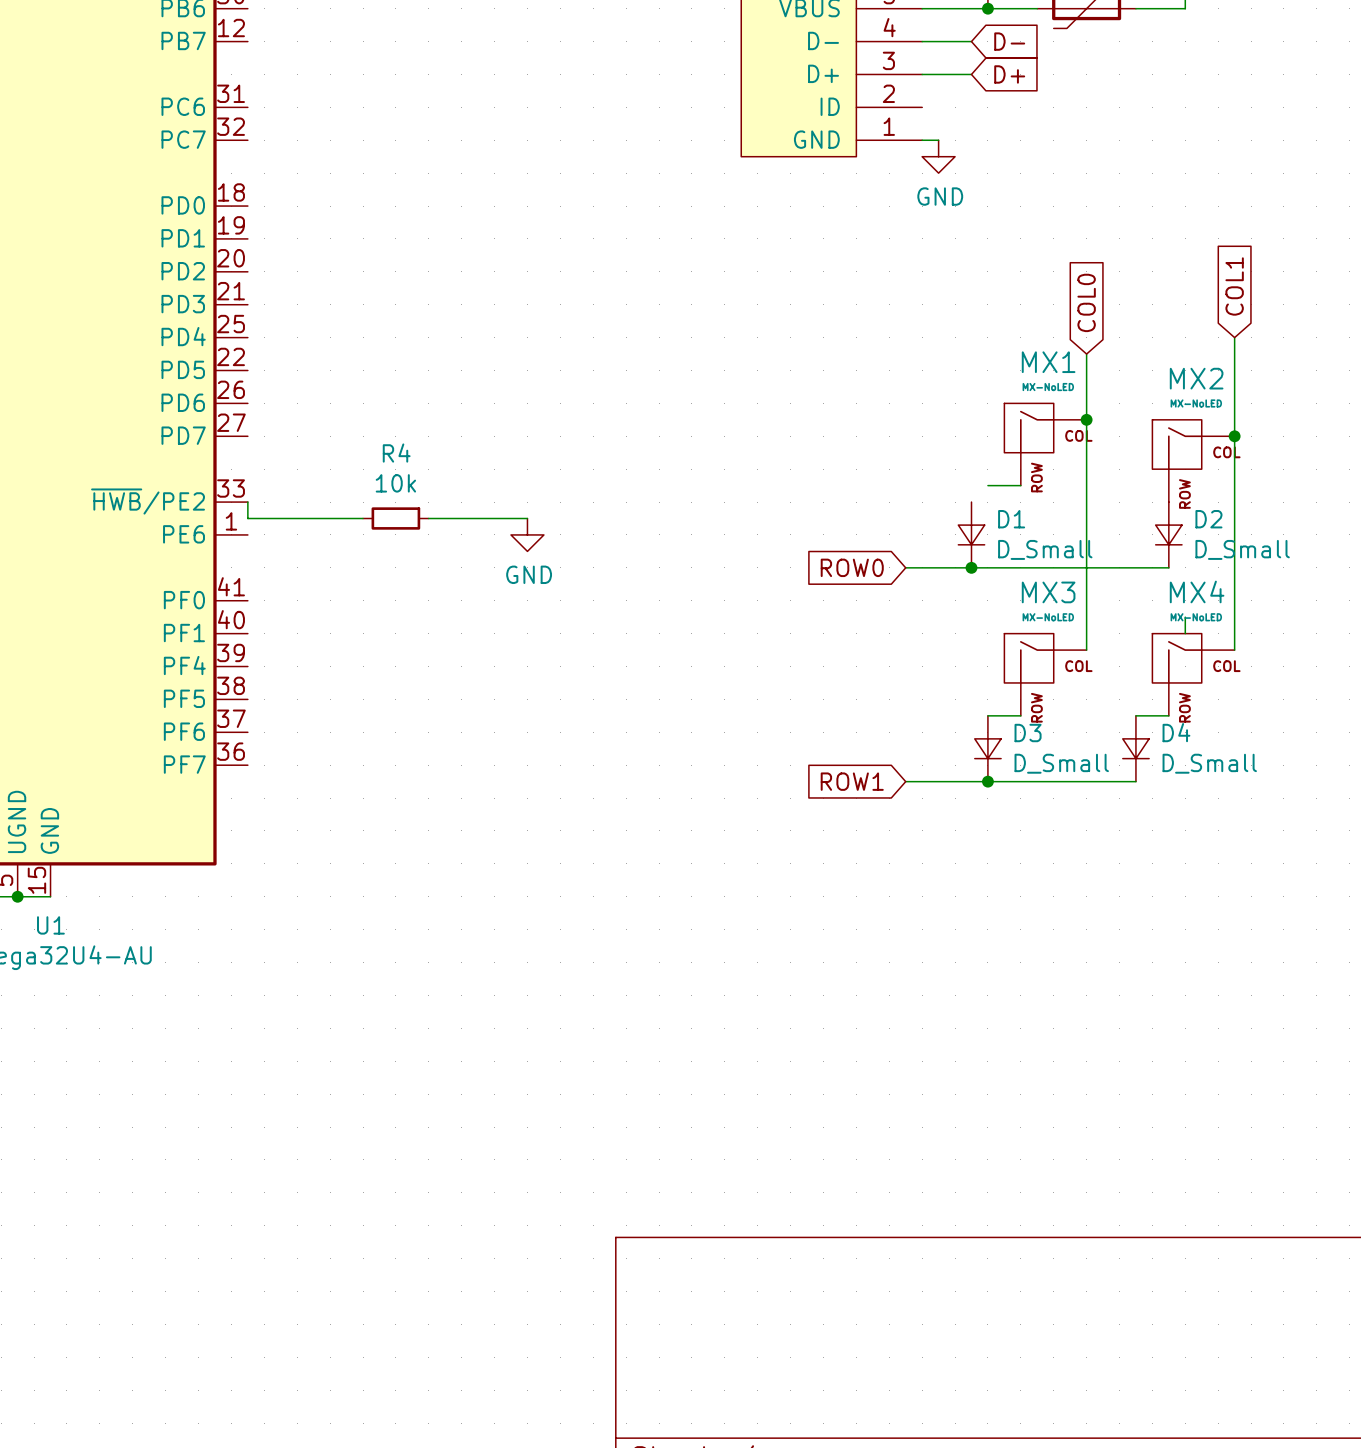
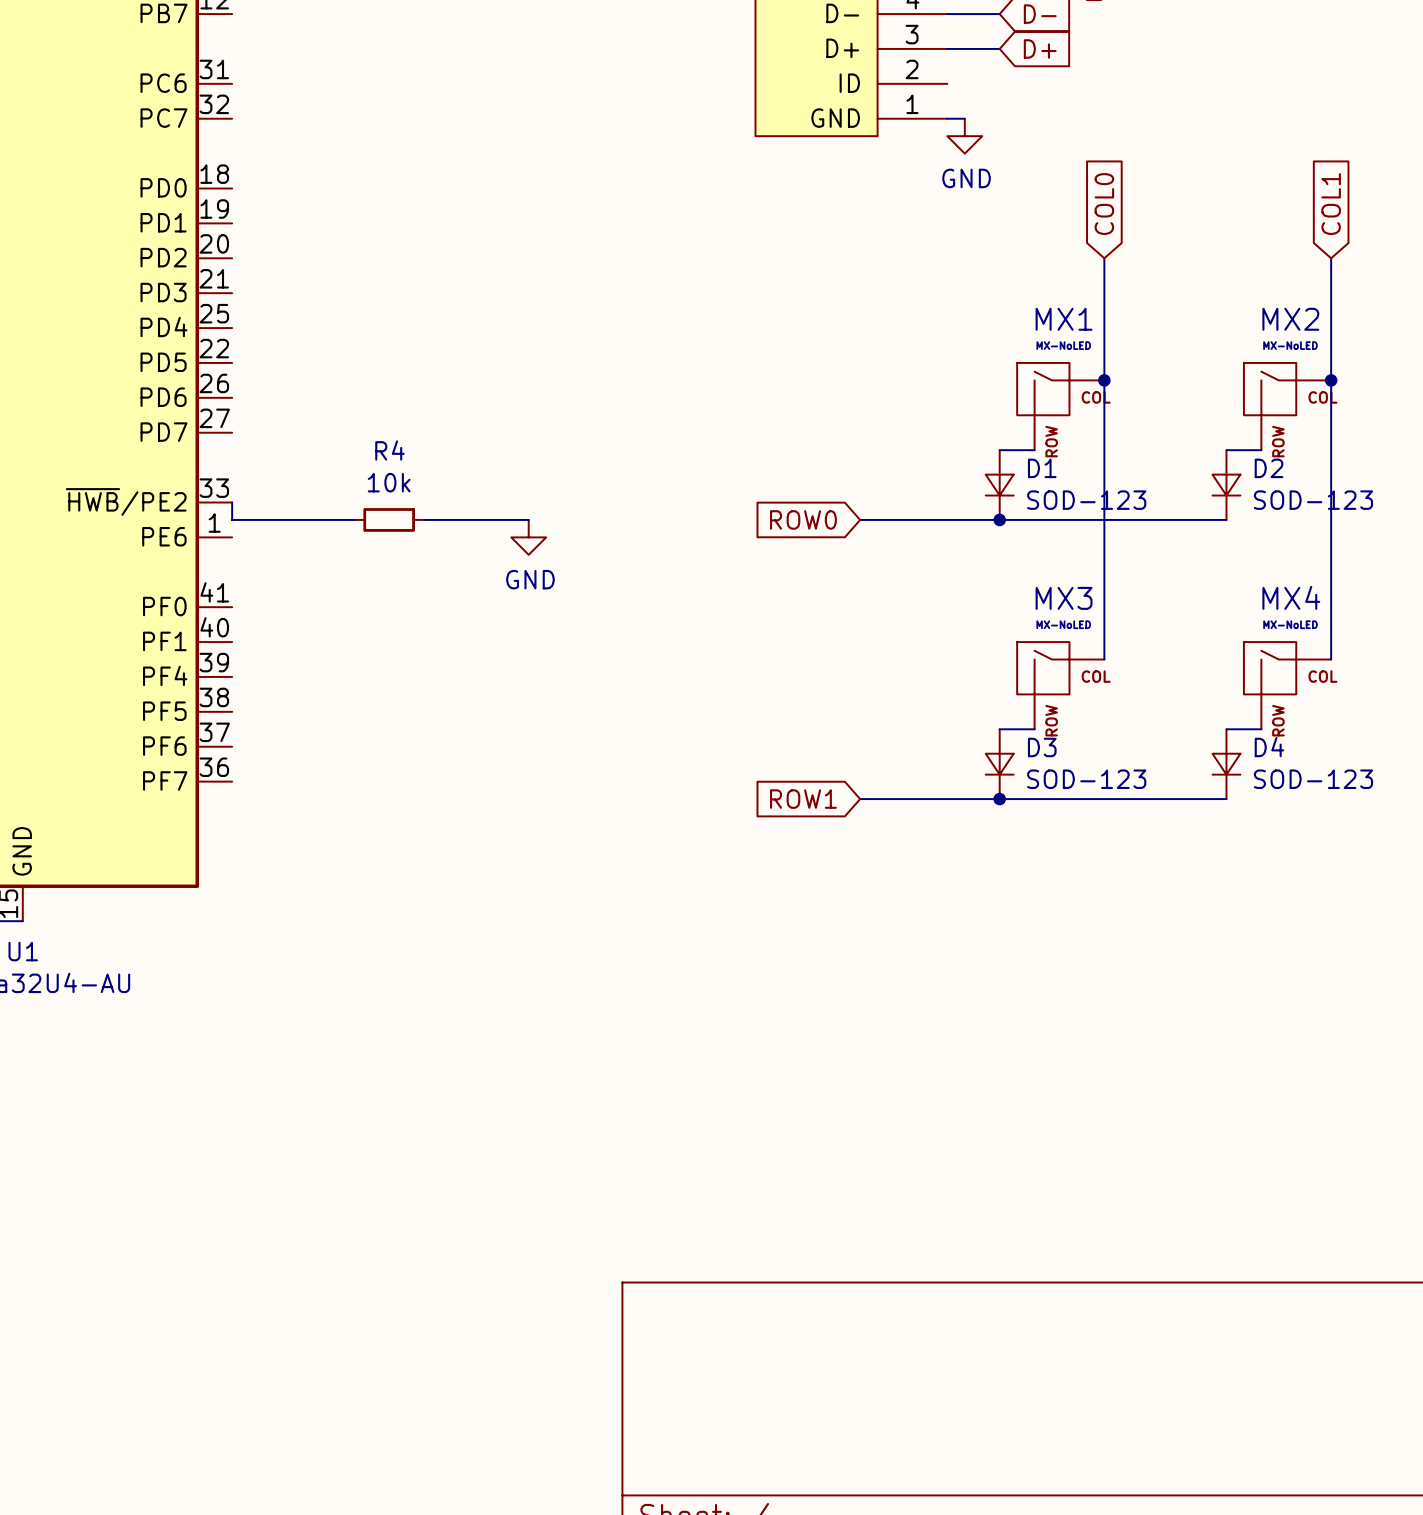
wire: none -> (1104, 258) (1104, 659)
wire: none -> (1331, 258) (1331, 659)
global label position: COL1 (1234, 286) -> COL1 (1331, 204)
global label position: COL0 (1086, 302) -> COL0 (1104, 204)
wire: (1234, 337) (1234, 650) -> none
wire: (1086, 354) (1086, 650) -> none
junction position: (1086, 419) -> (1104, 380)
junction position: (1234, 436) -> (1331, 380)
MX1 position: (1045, 444) -> (1060, 406)
wire: none -> (1226, 450) (1261, 450)
MX2 position: (1193, 460) -> (1287, 406)
wire: (987, 485) (1020, 485) -> (999, 450) (1034, 450)
wire: none -> (860, 519) (1226, 519)
D1 position: (971, 534) -> (999, 485)
D2 position: (1168, 534) -> (1226, 485)
D1 value: D_Small (1045, 549) -> SOD-123 (1086, 500)
D2 value: D_Small (1242, 549) -> SOD-123 (1313, 500)
global label position: ROW0 (852, 567) -> ROW0 (803, 519)
wire: (905, 567) (1168, 567) -> none
junction position: (971, 567) -> (999, 519)
wire: (1185, 617) (1185, 633) -> none
MX3 position: (1045, 674) -> (1060, 685)
MX4 position: (1193, 674) -> (1287, 685)
wire: (1004, 715) (1020, 715) -> (999, 729) (1017, 729)
wire: (1135, 715) (1168, 715) -> (1226, 729) (1261, 729)
D3 position: (987, 748) -> (999, 764)
D4 position: (1135, 748) -> (1226, 764)
D3 value: D_Small (1061, 763) -> SOD-123 (1086, 779)
D4 value: D_Small (1209, 763) -> SOD-123 (1313, 779)
wire: none -> (860, 799) (929, 799)
global label position: ROW1 (852, 781) -> ROW1 (803, 799)
junction position: (987, 781) -> (999, 799)
wire: none -> (1174, 799) (1226, 799)

